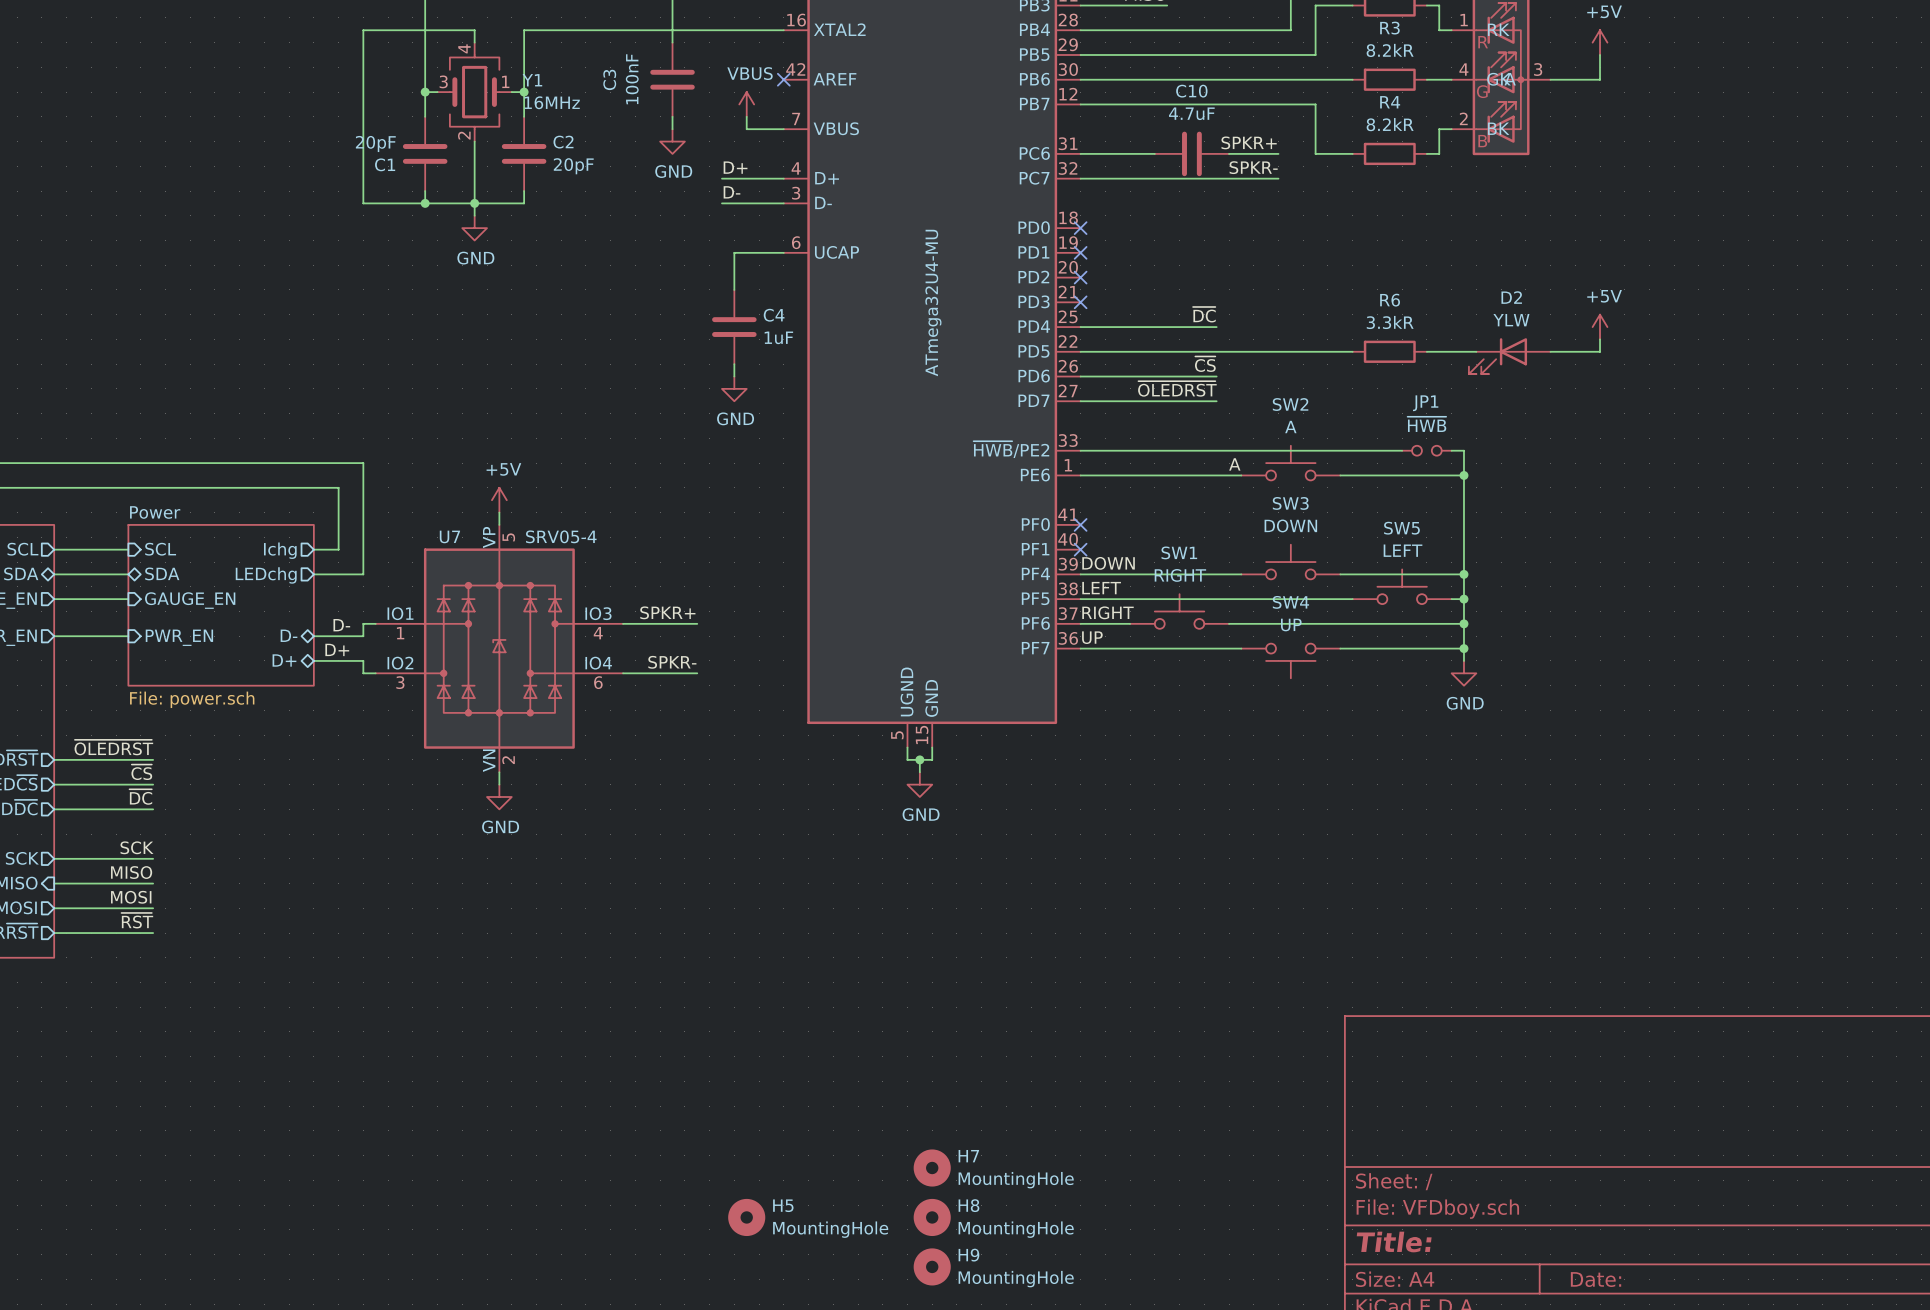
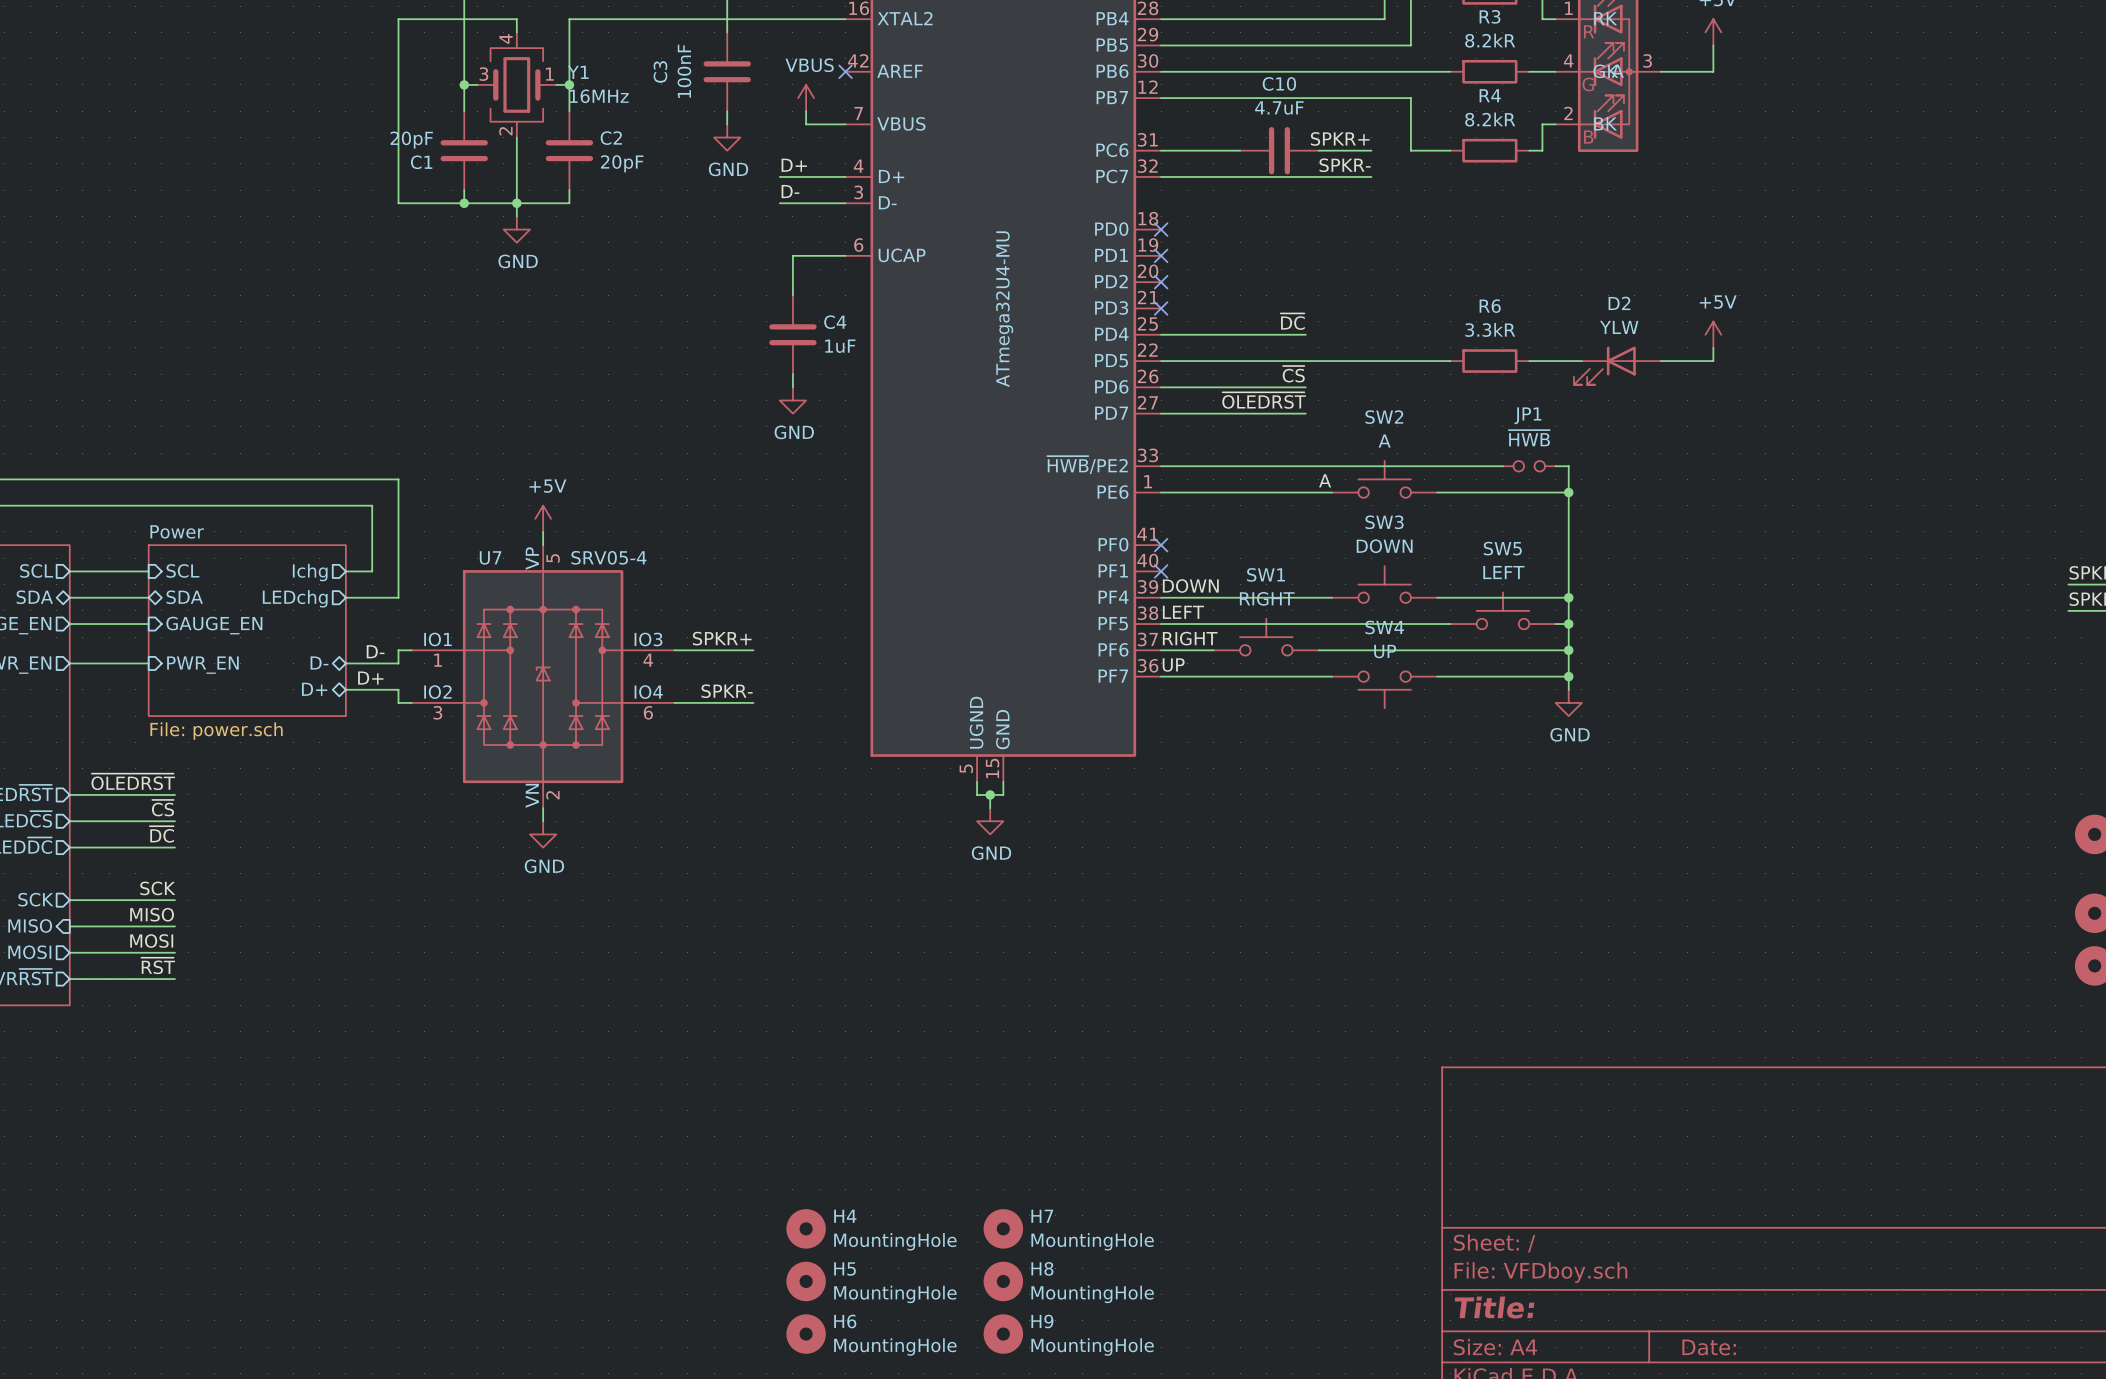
H4: none -> MountingHole (806, 1228)
H6: none -> MountingHole (806, 1334)

